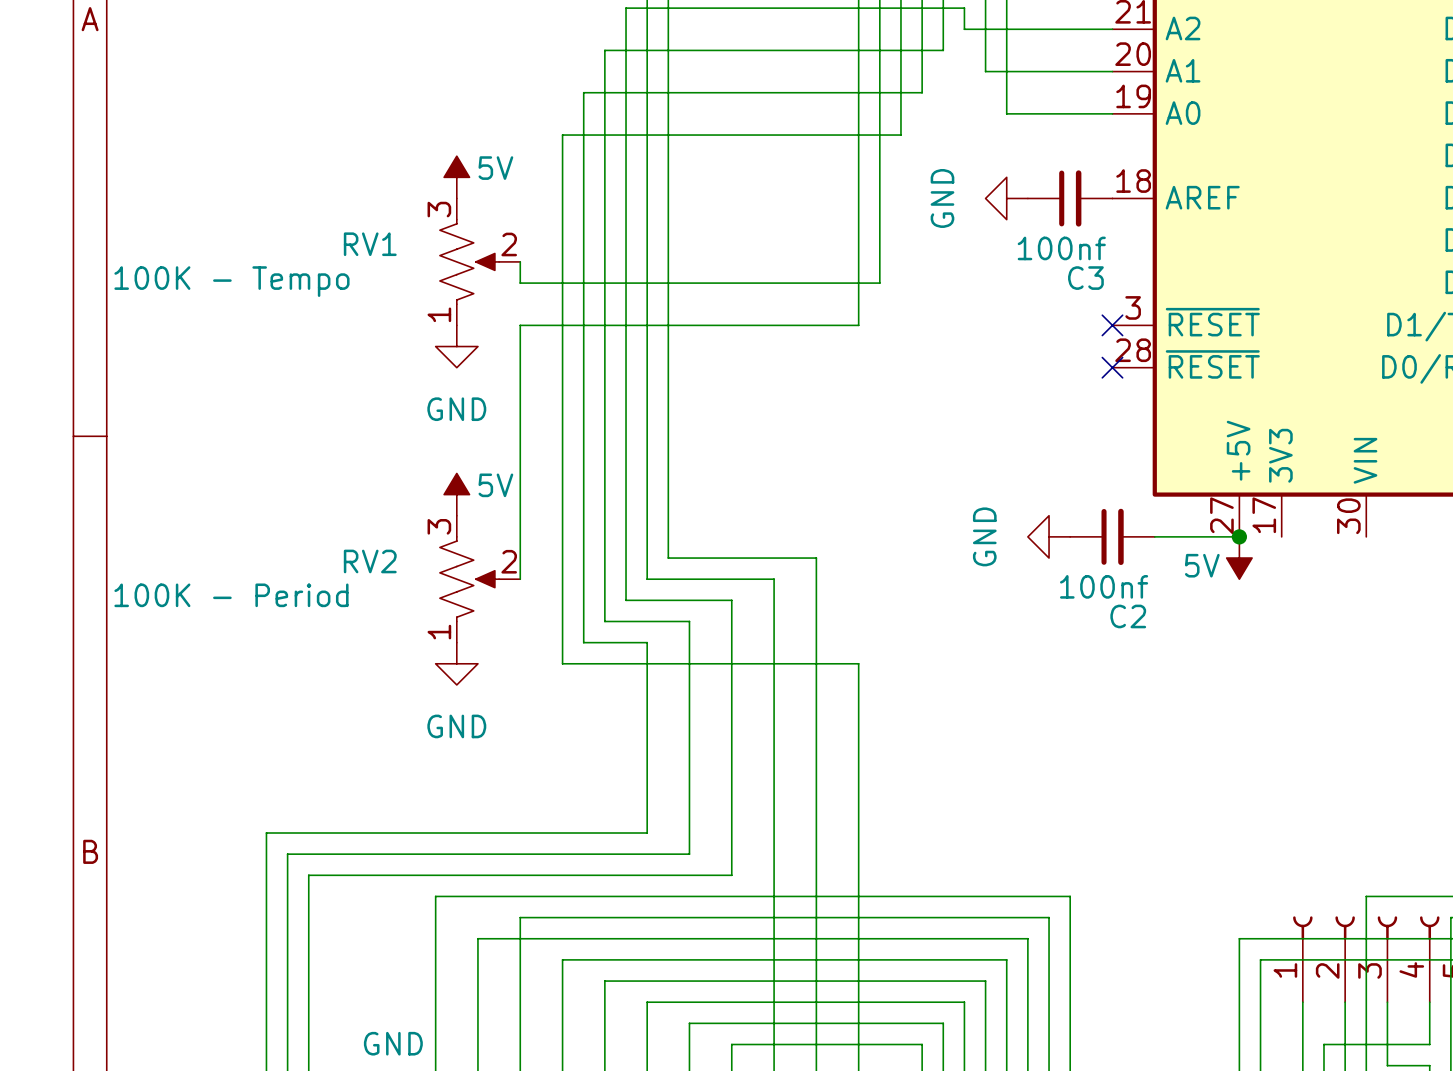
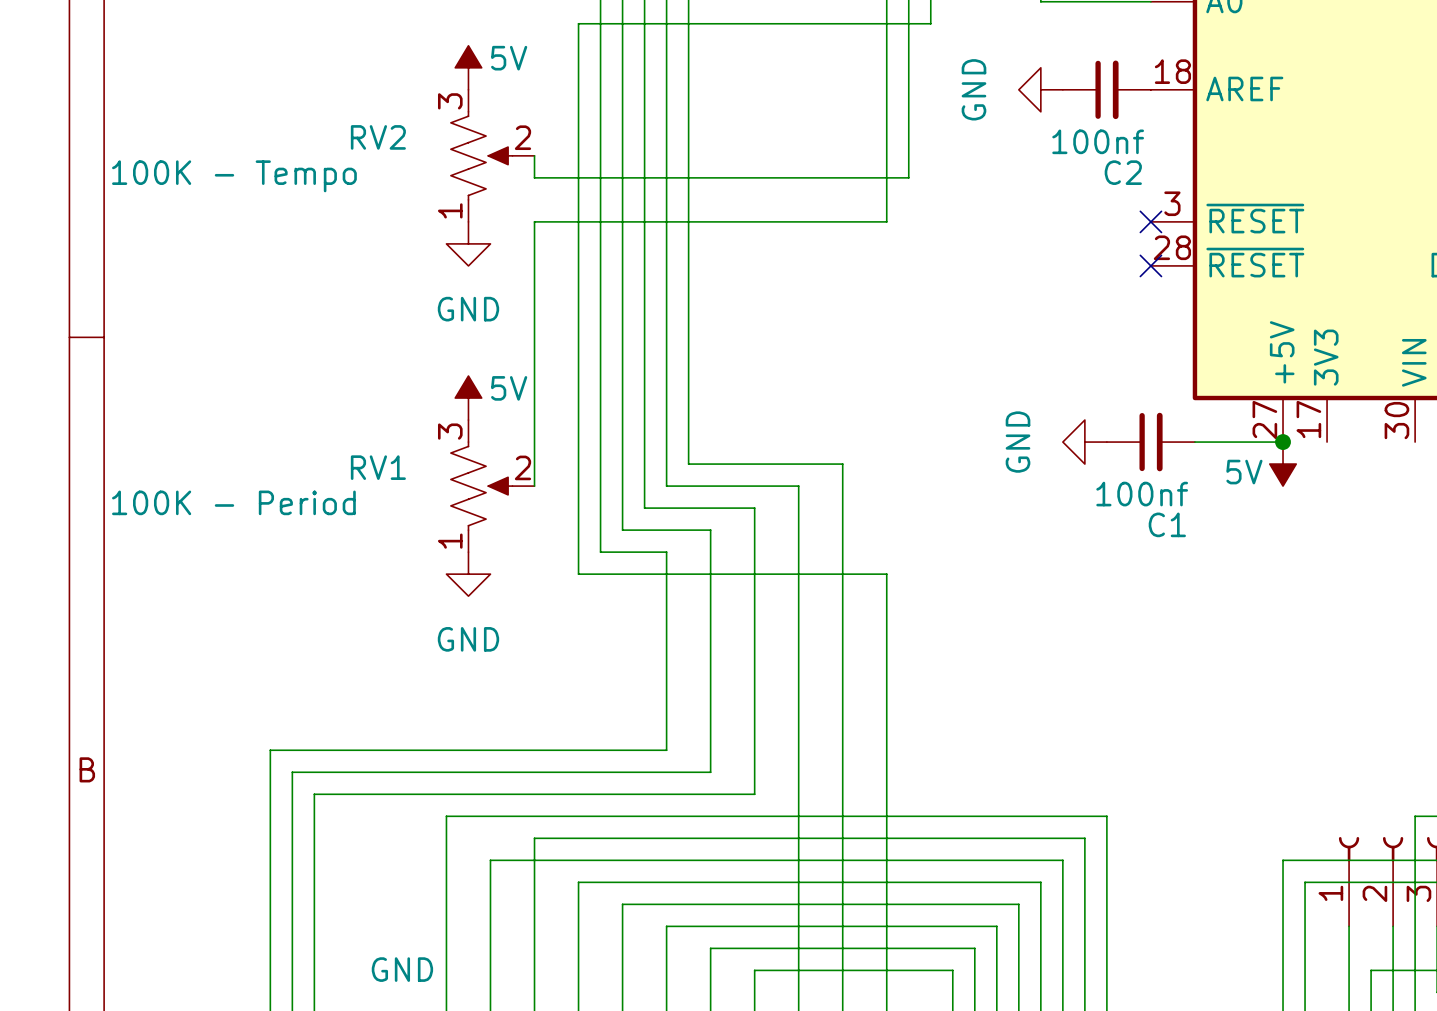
RV1 name: RV1 (370, 244) -> RV2 (378, 137)
C3 name: C3 (1085, 278) -> C2 (1123, 172)
RV2 name: RV2 (370, 561) -> RV1 (378, 467)
C2 name: C2 (1128, 616) -> C1 (1167, 524)

